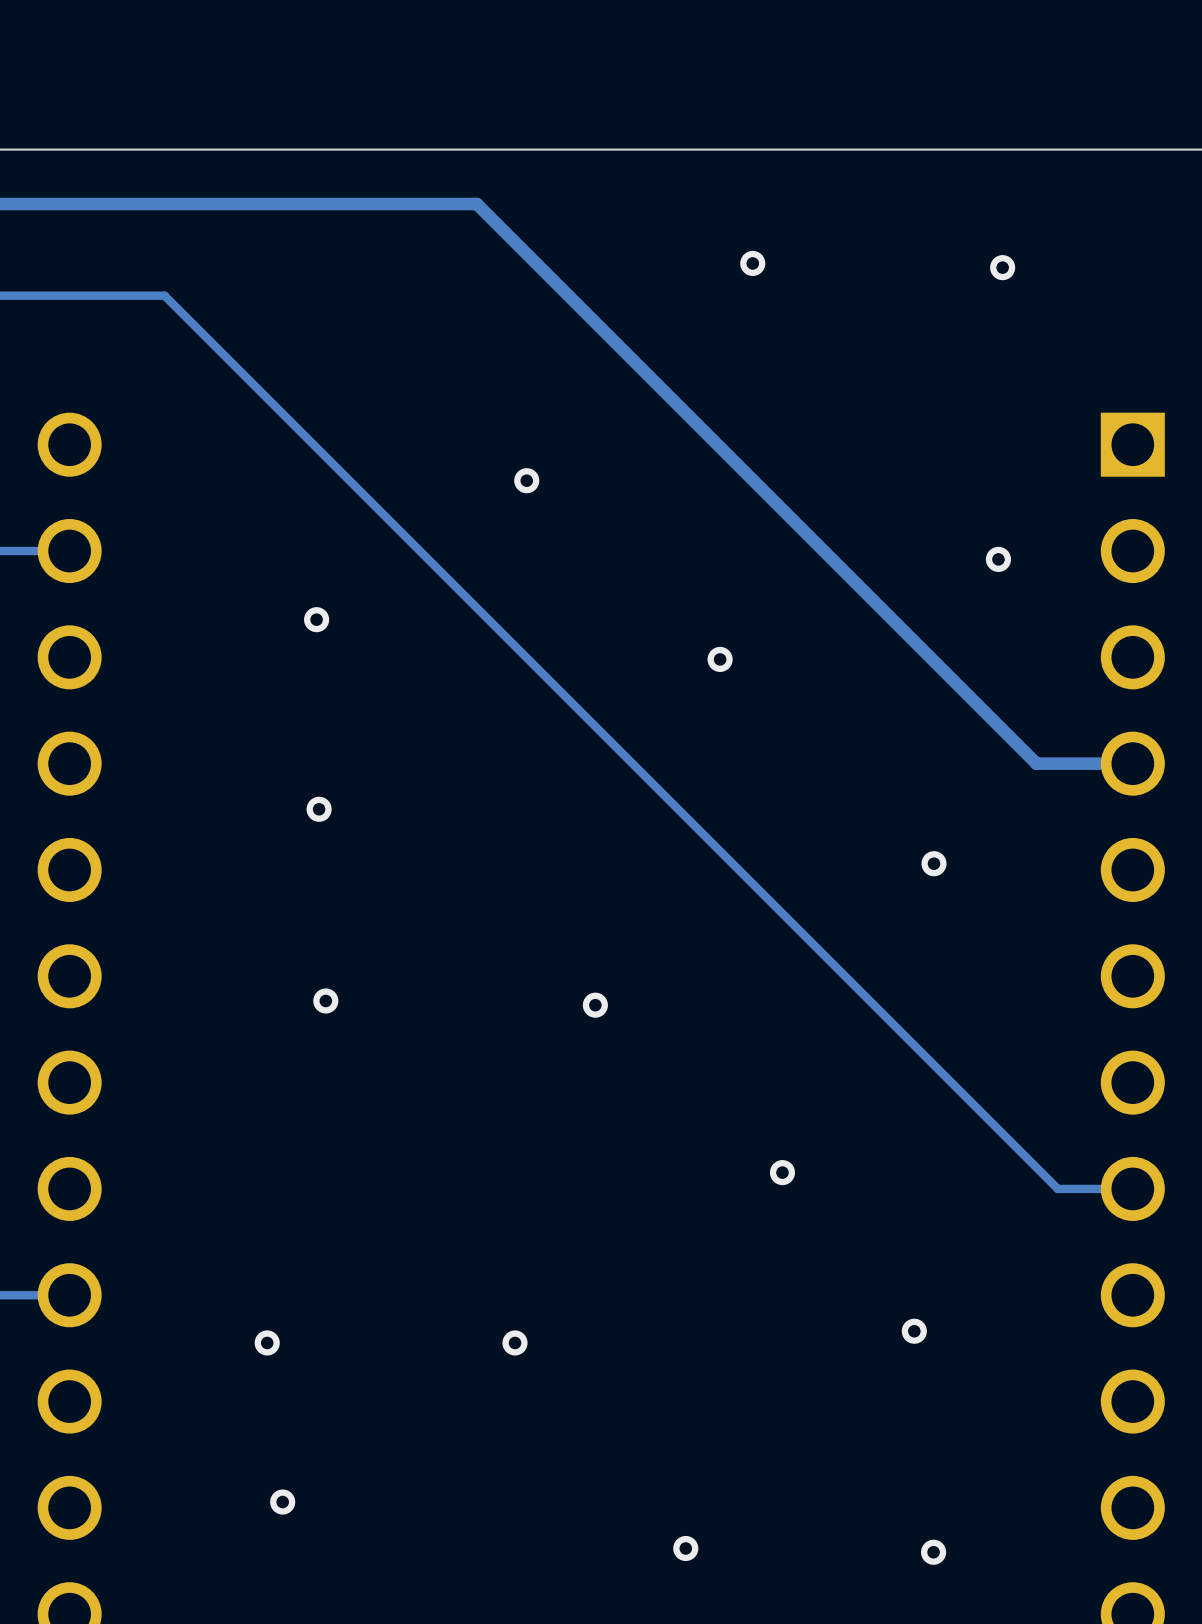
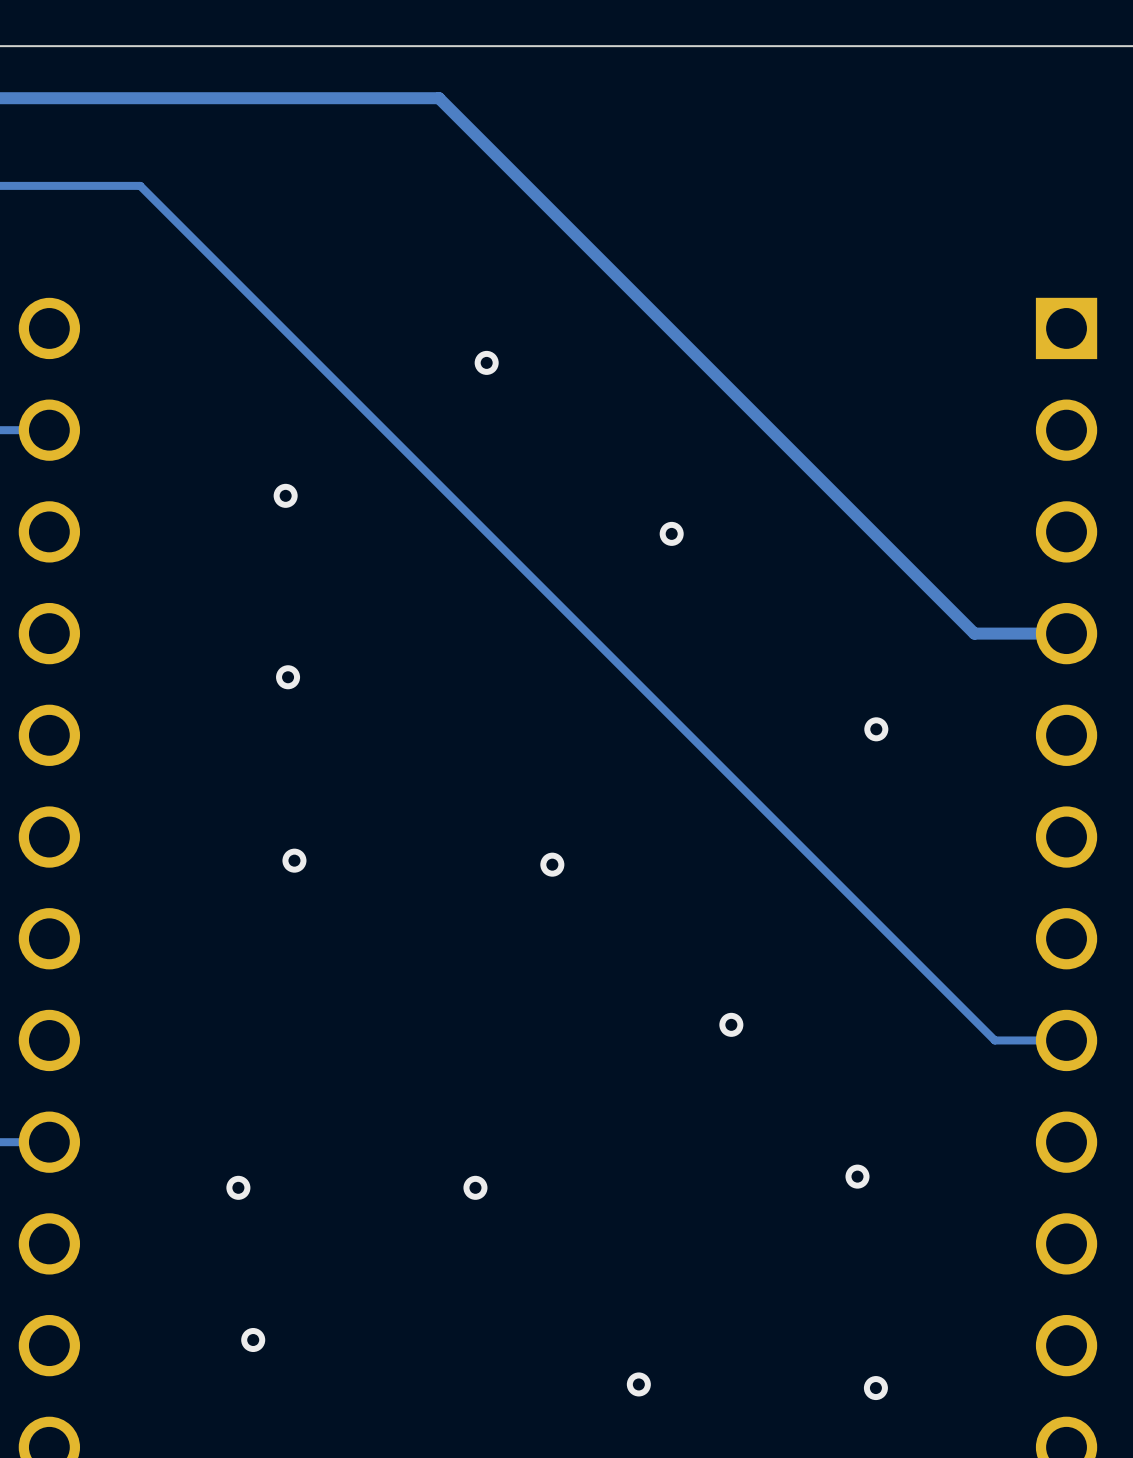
via: (752, 263) -> none
via: (1002, 267) -> none
via: (998, 559) -> none

